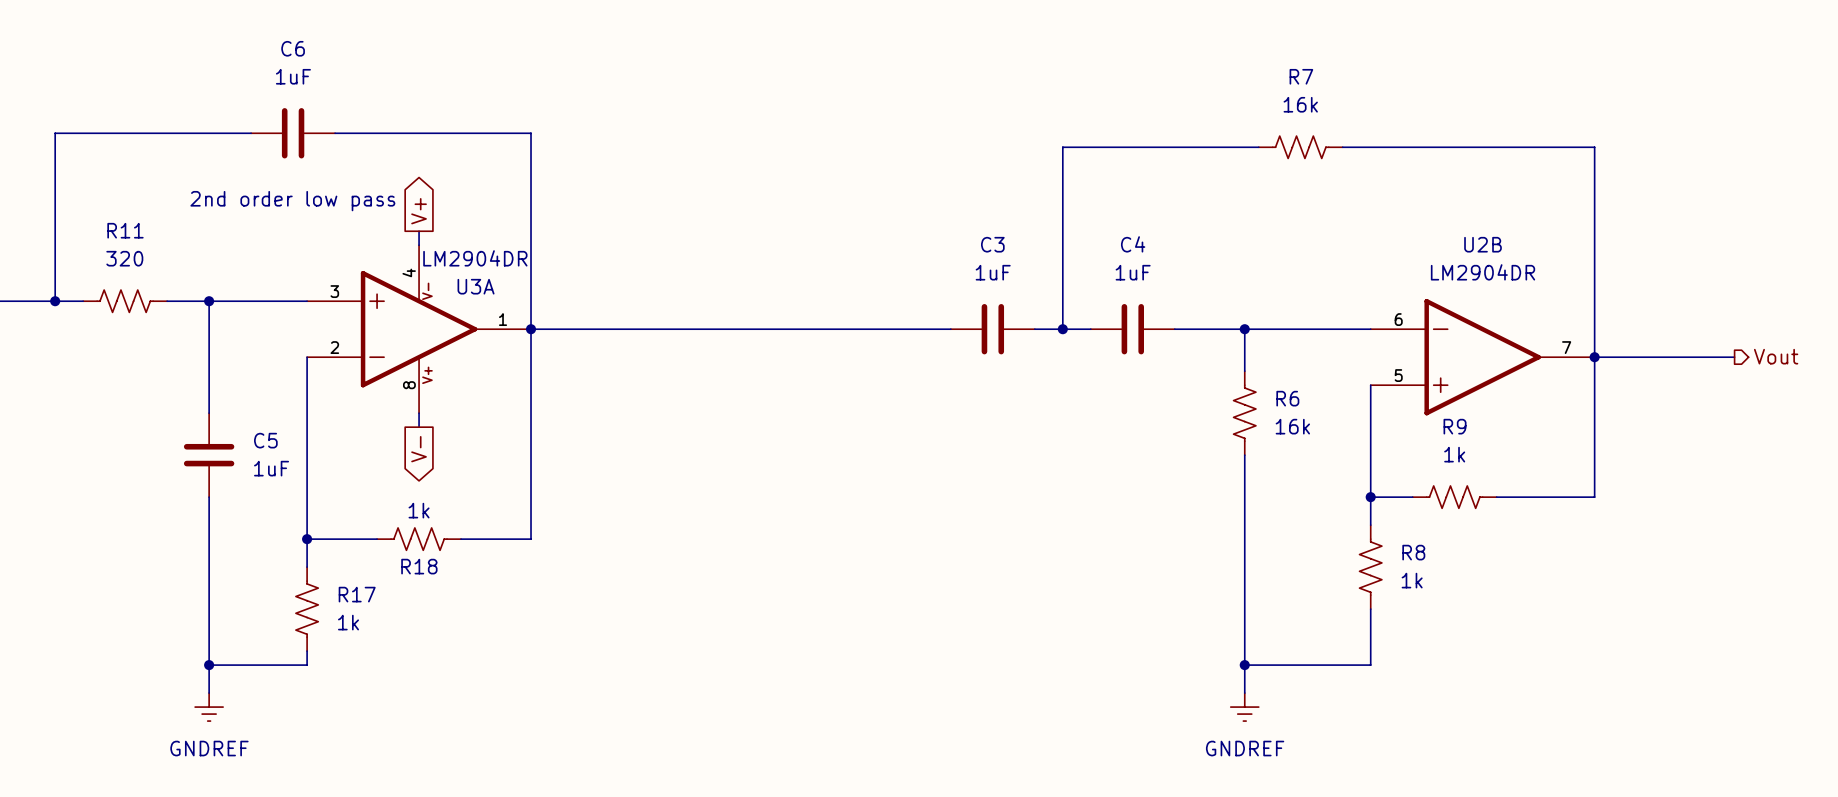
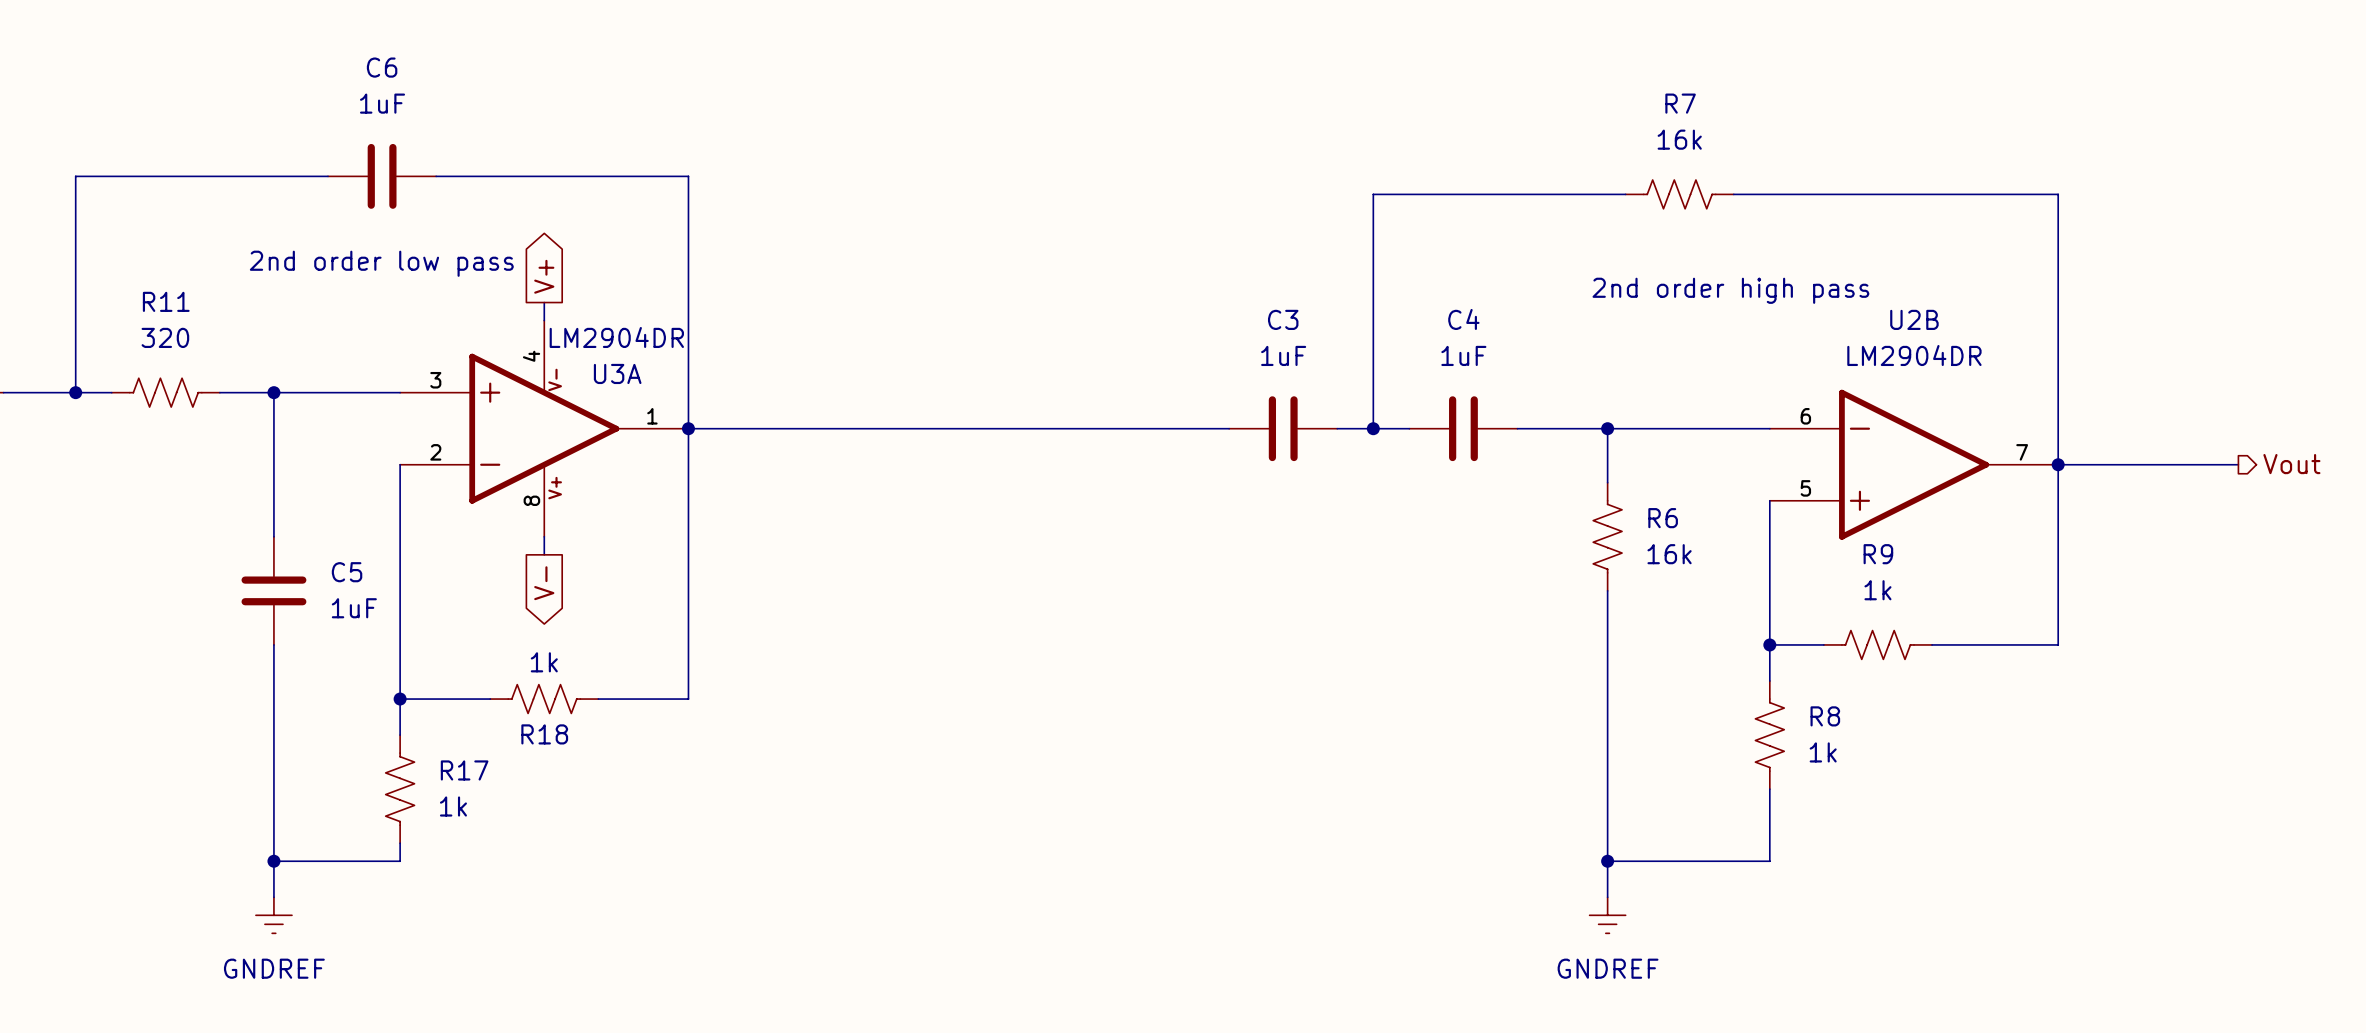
text: none -> 2nd order high pass (1730, 290)

